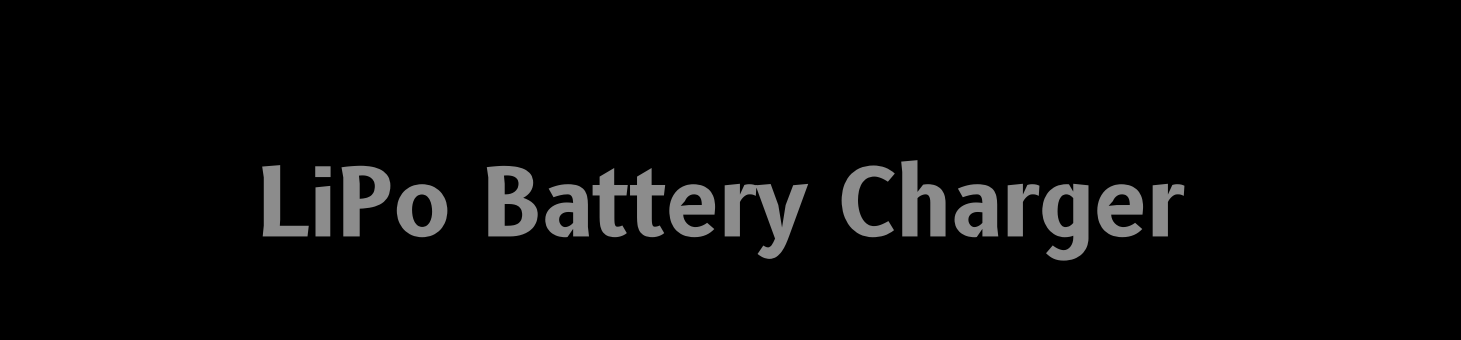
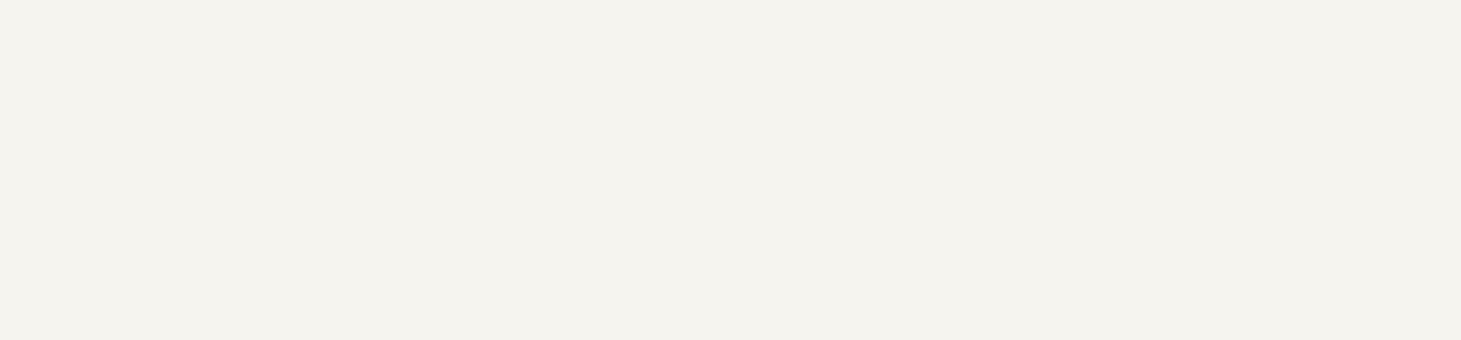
text: LiPo Battery Charger (723, 210) -> none

